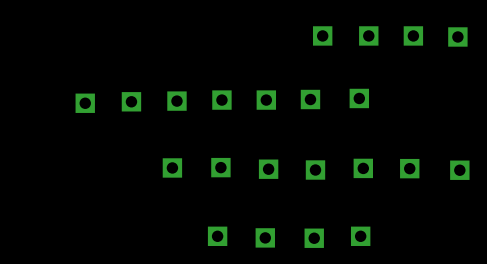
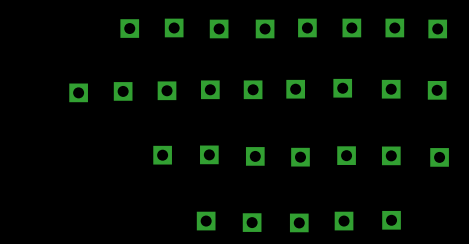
part: none -> (174, 27)
part: none -> (129, 28)
part: none -> (219, 28)
part: none -> (265, 28)
part: none -> (391, 89)
part: none -> (437, 90)
part: none -> (391, 220)

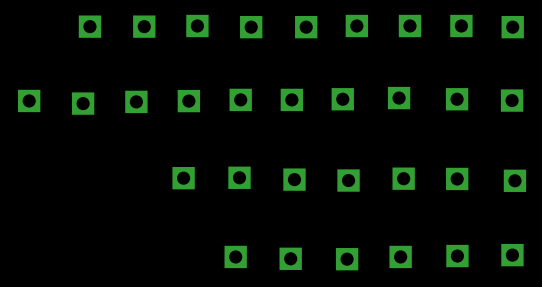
part: none -> (89, 26)
part: none -> (29, 100)
part: none -> (512, 255)

